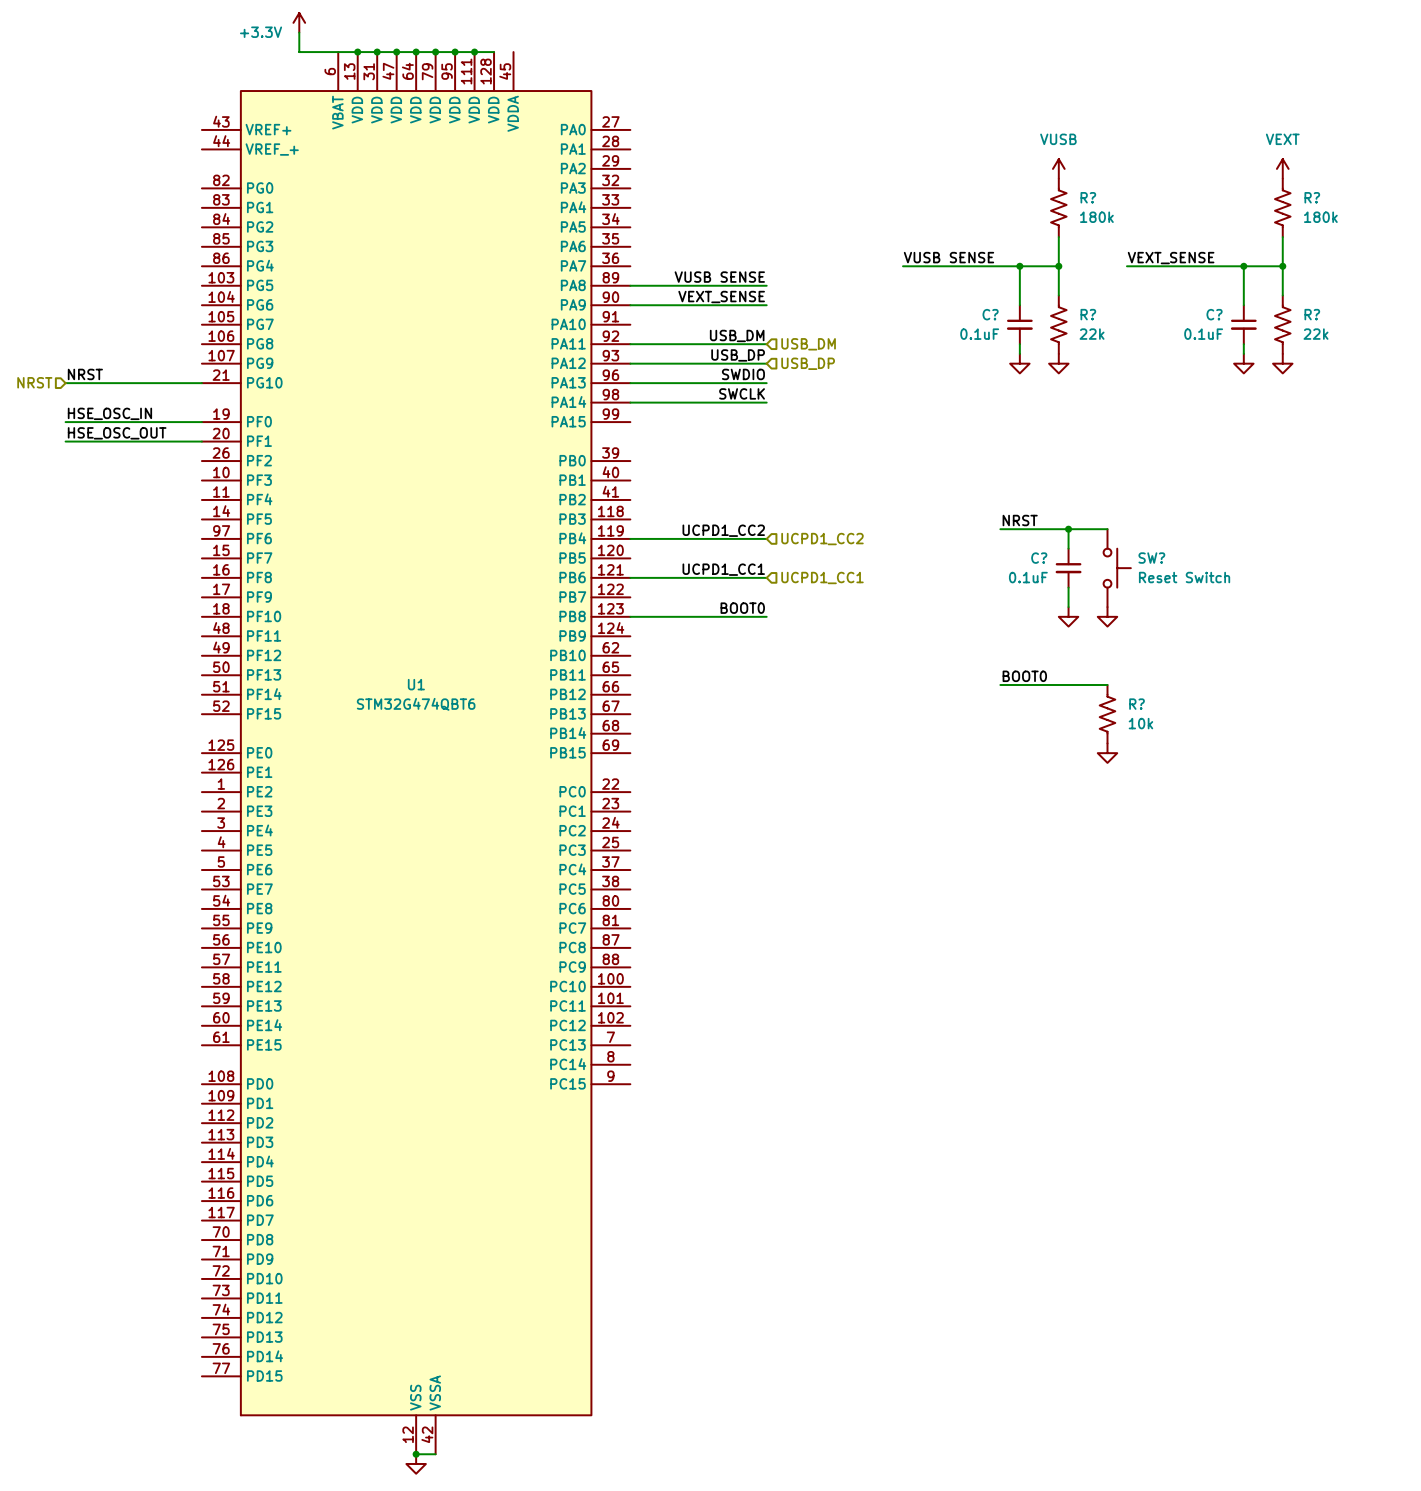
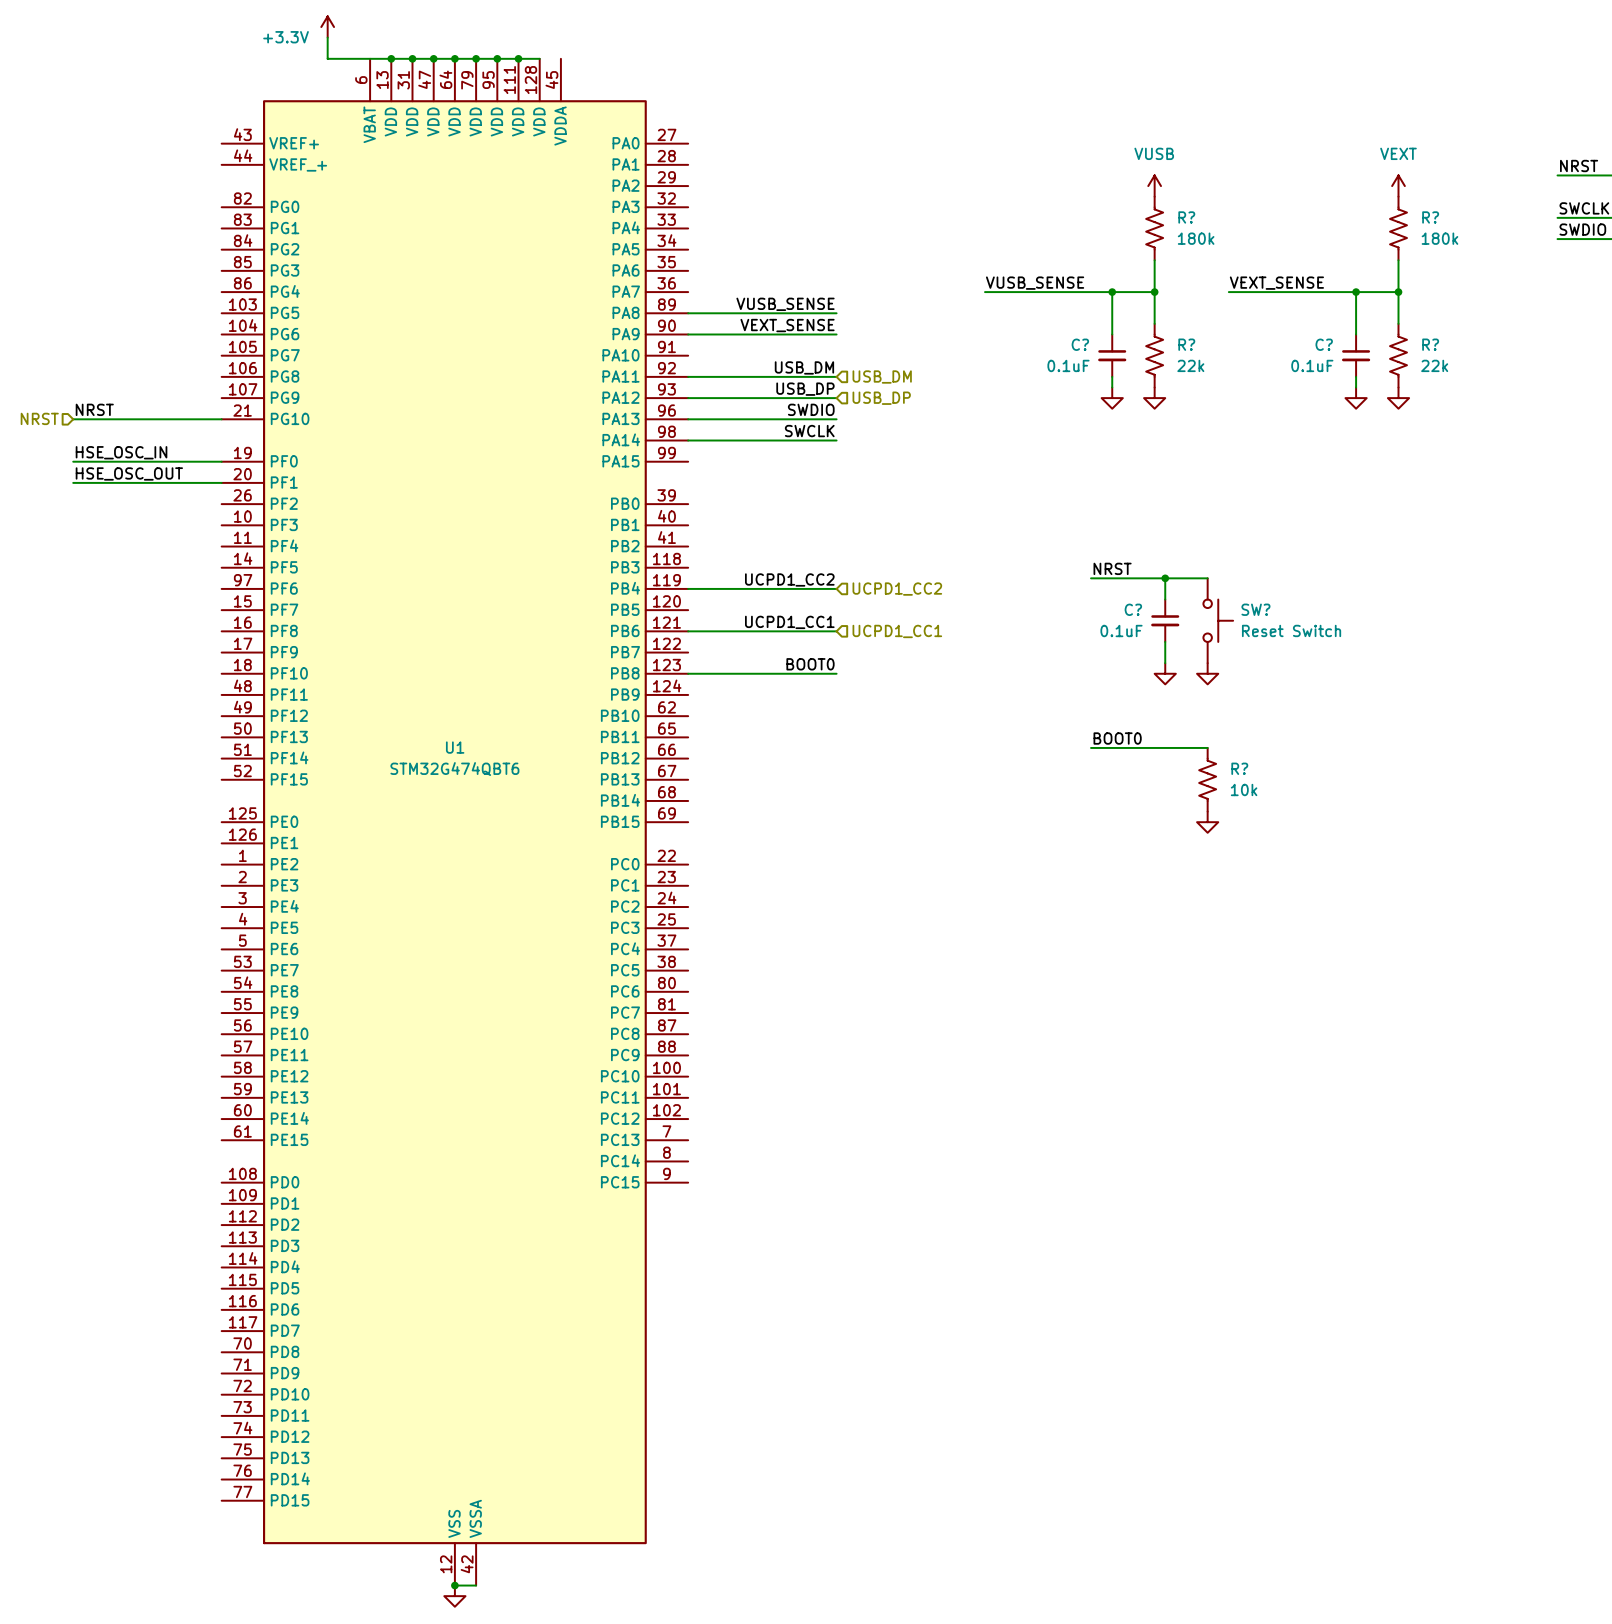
label: VUSB SENSE (948, 257) -> VUSB_SENSE (1035, 283)
label: VUSB SENSE (719, 277) -> VUSB_SENSE (785, 304)

